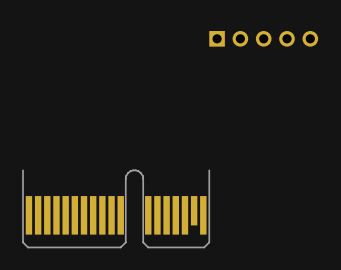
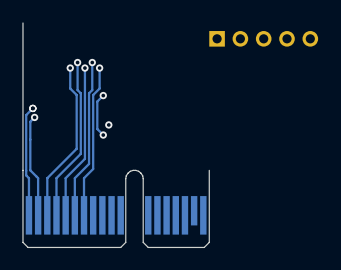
board edge: none -> (22, 22) (22, 170)
track: none -> (77, 62) (77, 90) (80, 93) (80, 153) (56, 178) (56, 215)
via: none -> (77, 62)
track: none -> (92, 62) (92, 90) (89, 93) (89, 163) (74, 178) (74, 215)
via: none -> (92, 62)
track: none -> (70, 68) (70, 88) (76, 94) (76, 148) (47, 178) (47, 215)
via: none -> (70, 68)
track: none -> (84, 68) (84, 158) (65, 178) (65, 215)
via: none -> (84, 68)
track: none -> (99, 68) (99, 88) (93, 94) (93, 169) (84, 178) (84, 215)
via: none -> (99, 68)
track: none -> (103, 95) (97, 101) (97, 129) (103, 135)
via: none -> (103, 95)
track: none -> (32, 108) (26, 115) (26, 175) (28, 178) (28, 215)
via: none -> (32, 108)
track: none -> (34, 117) (30, 121) (30, 170) (38, 178) (38, 215)
via: none -> (34, 117)
via: none -> (108, 124)
via: none -> (103, 135)

